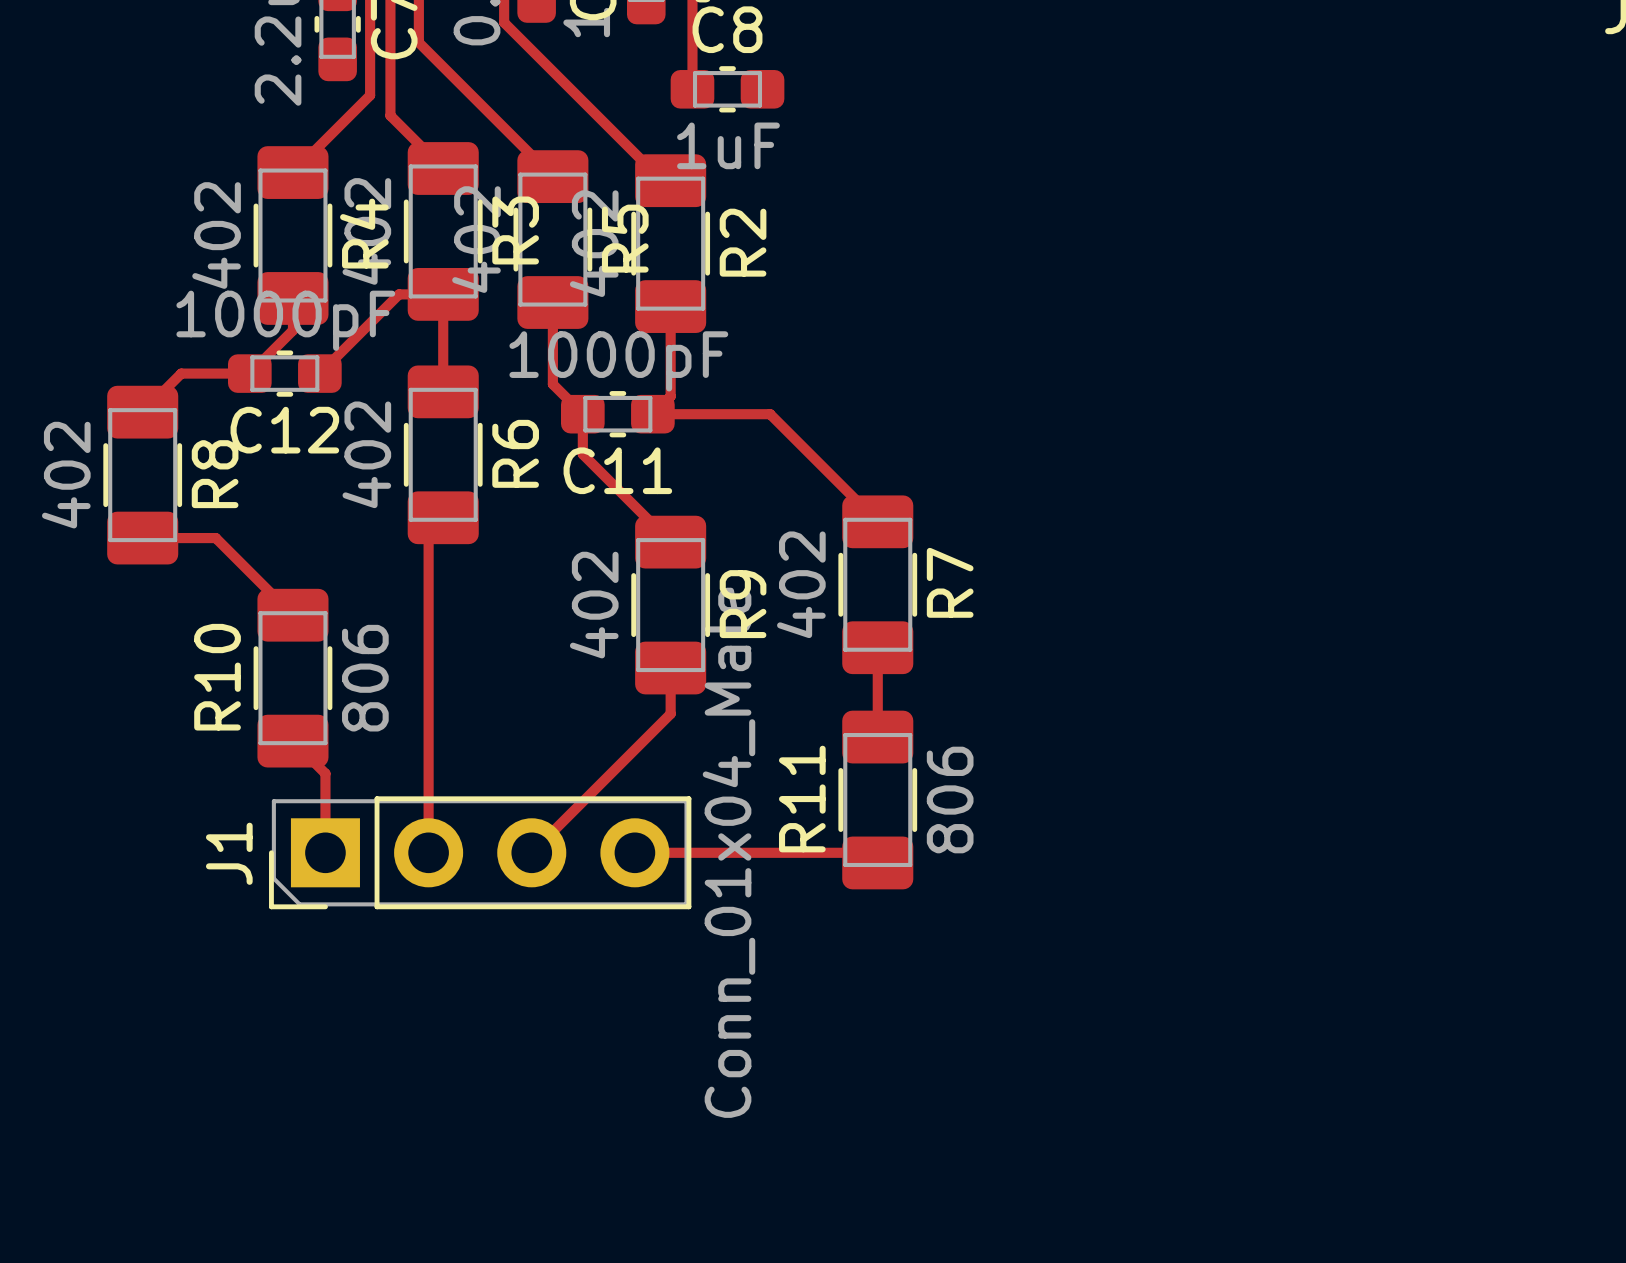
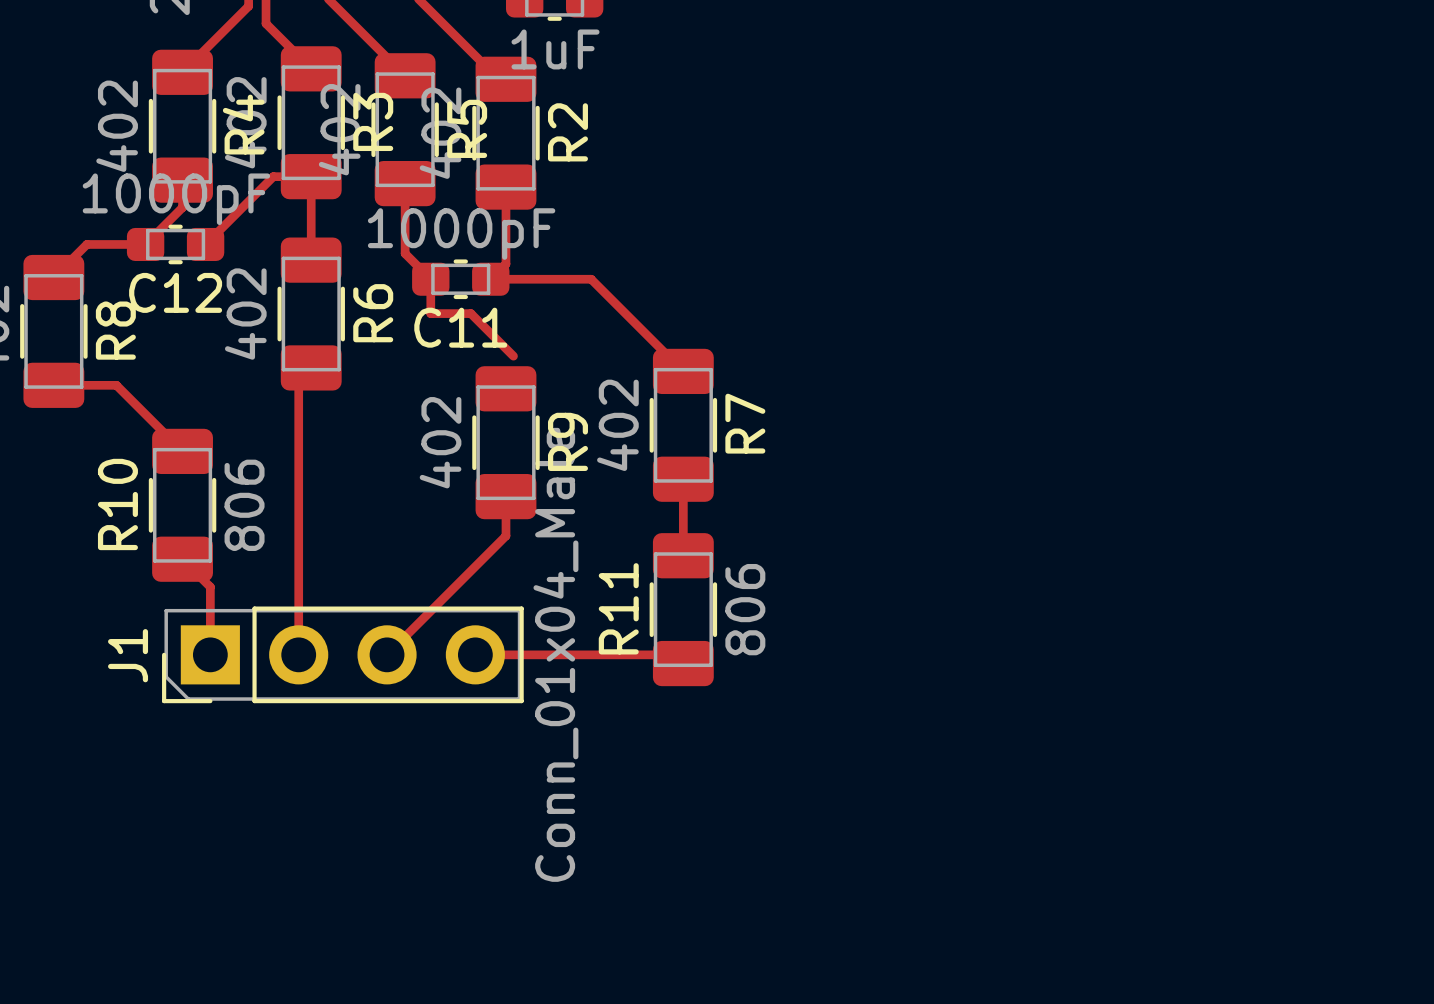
top track: (582, 454) (670, 542) -> (430, 313) (470, 313) (513, 356)

